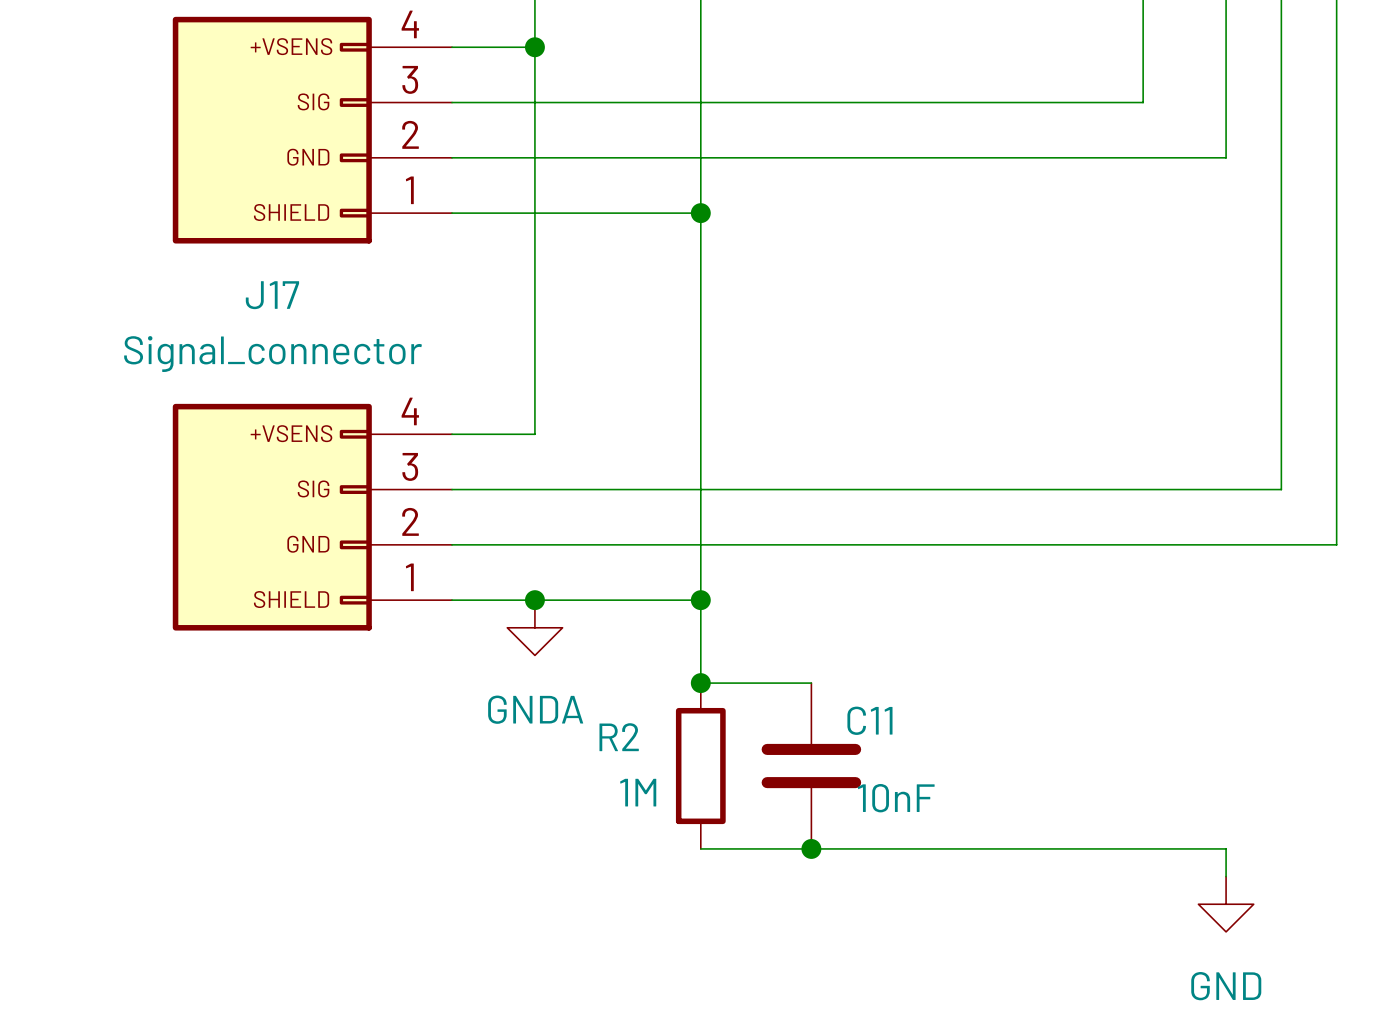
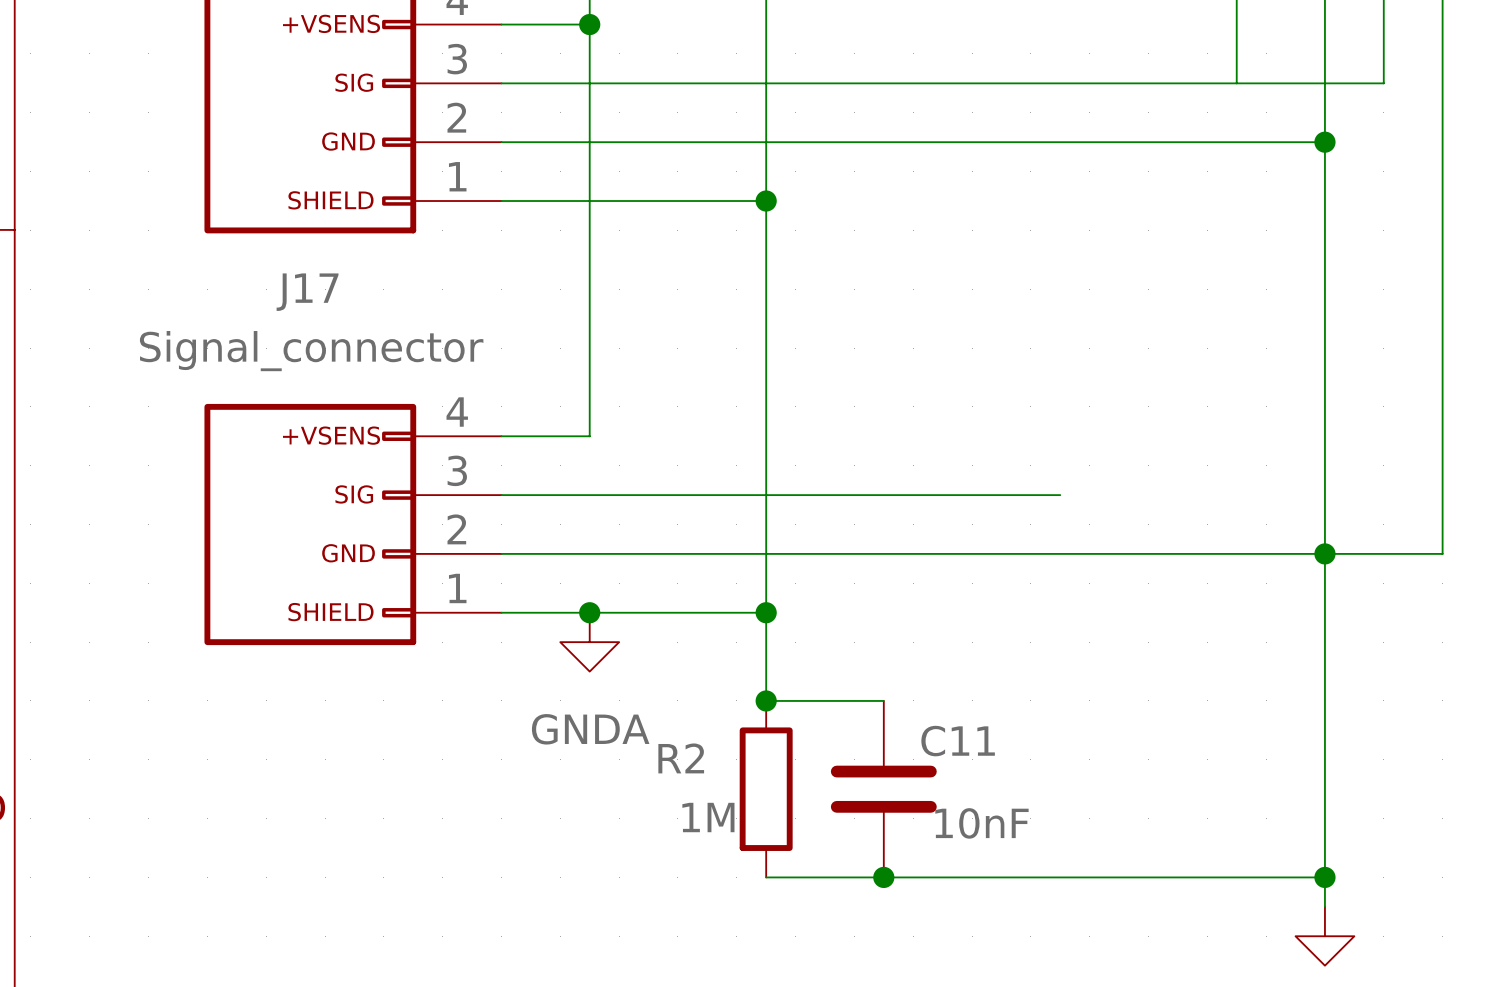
wire: (1281, 102) (1281, 489) (977, 489) -> (1383, 83) (1236, 83)
wire: none -> (1324, 142) (1324, 877)
junction: none -> (1324, 142)
junction: none -> (1324, 553)
junction: none -> (1324, 877)

